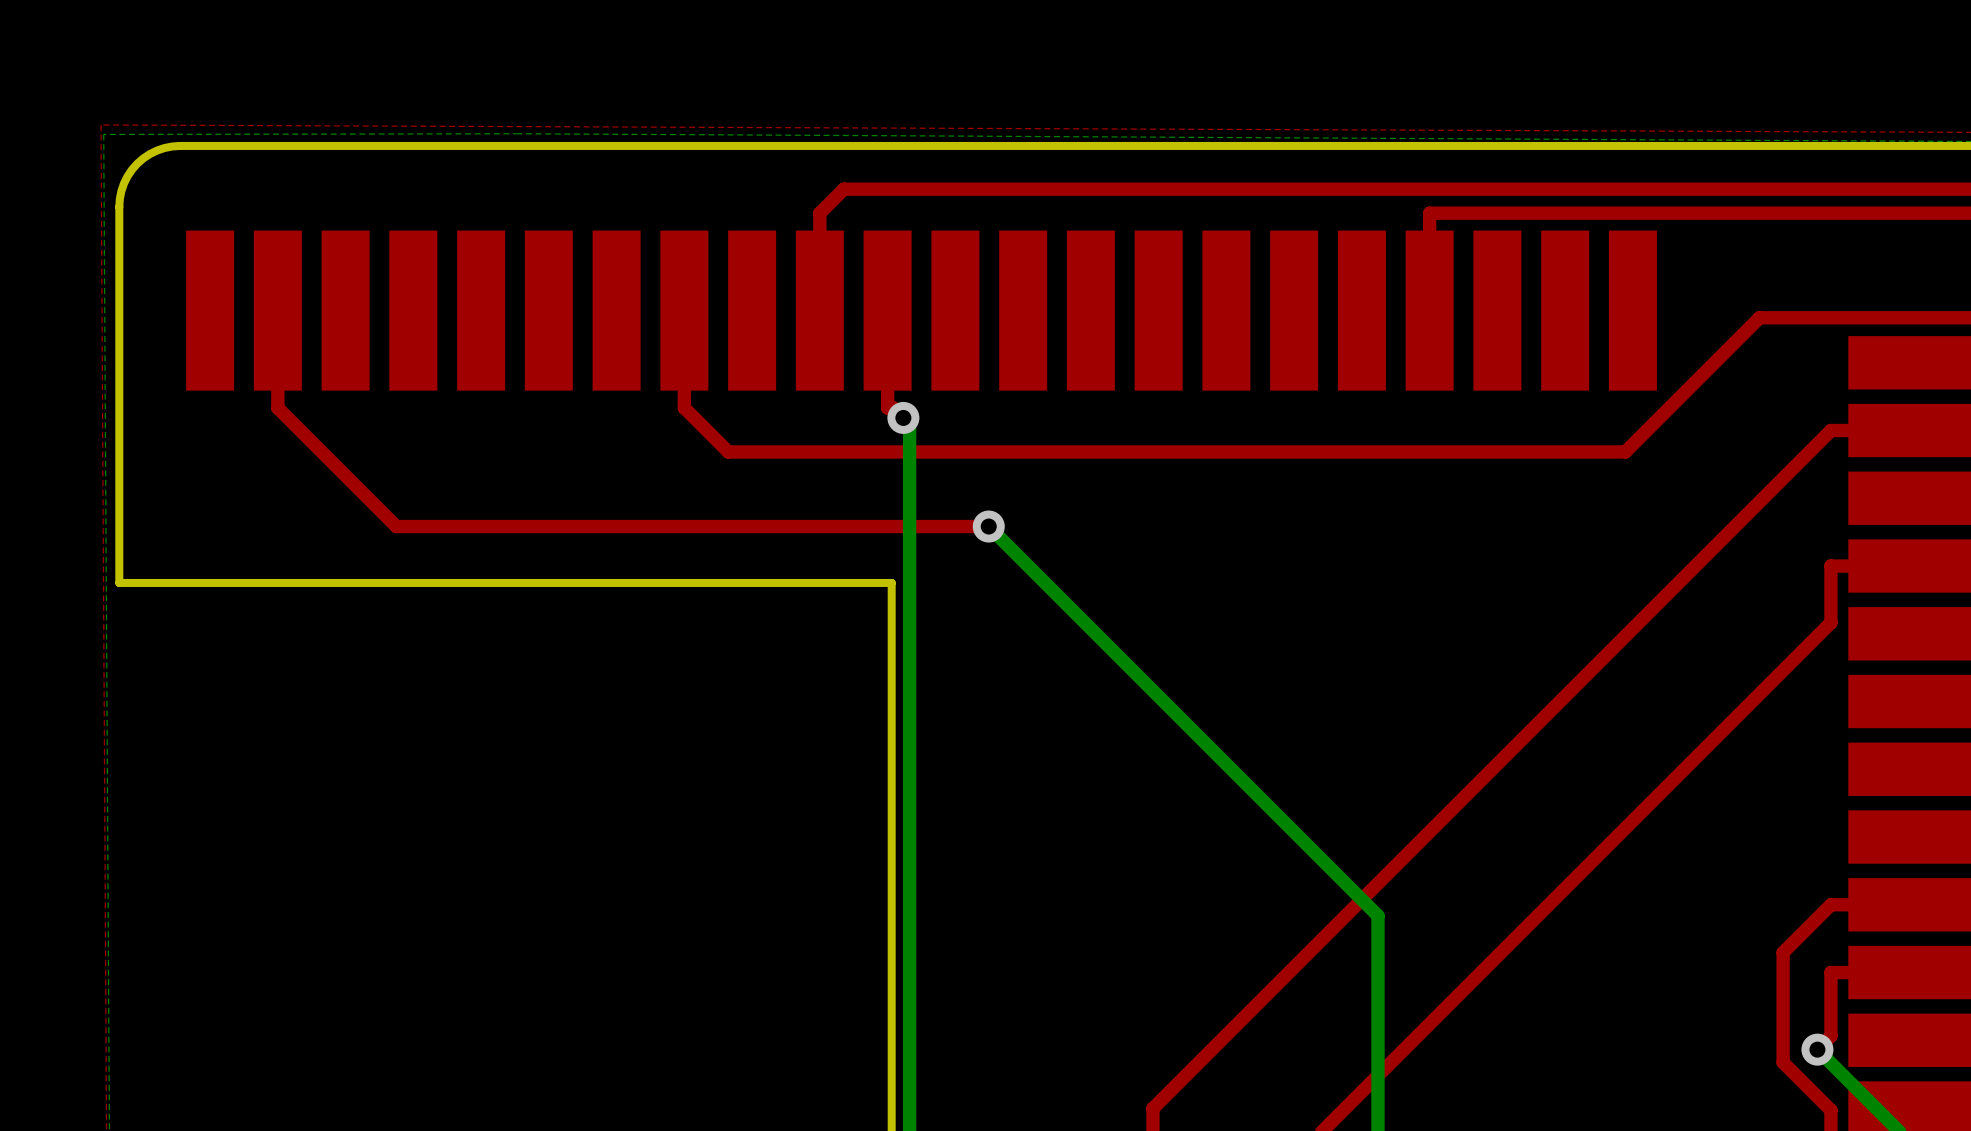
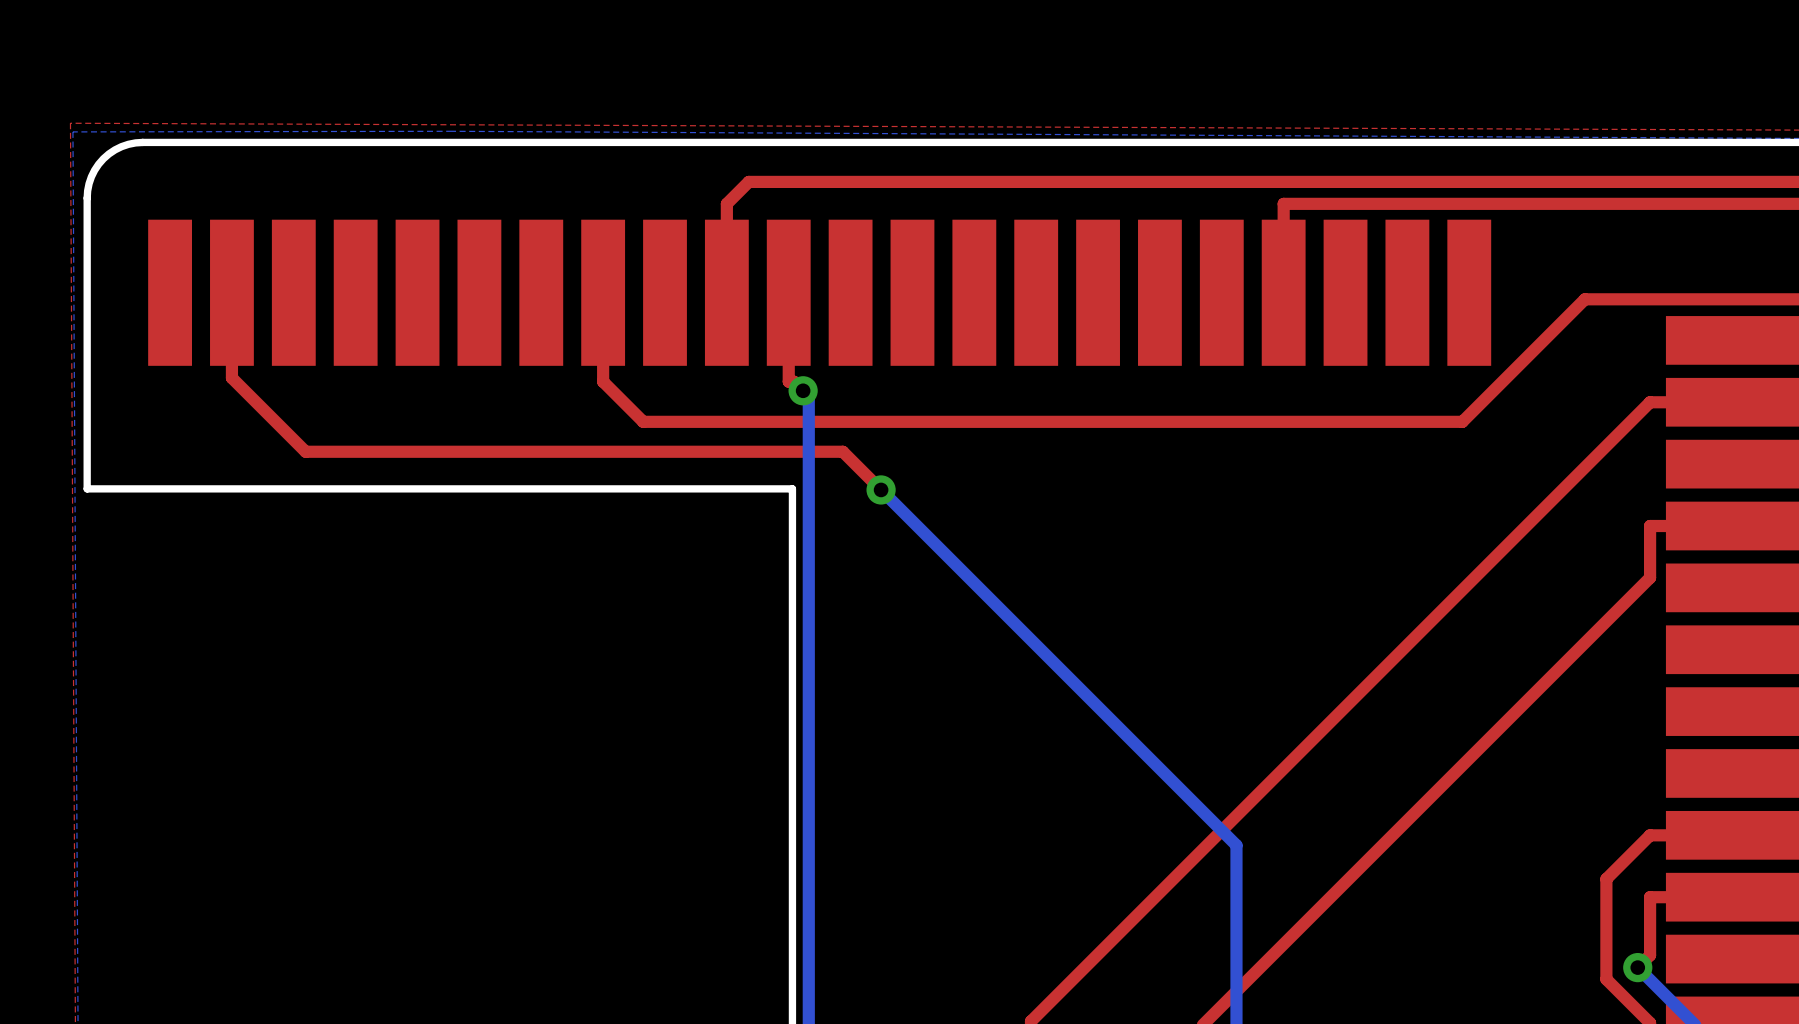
top track: (277, 403) (277, 407) (396, 526) (988, 526) -> (231, 378) (305, 451) (842, 451) (881, 489)
board edge: (119, 525) (119, 582) (891, 582) -> (87, 488) (792, 488) (792, 541)

